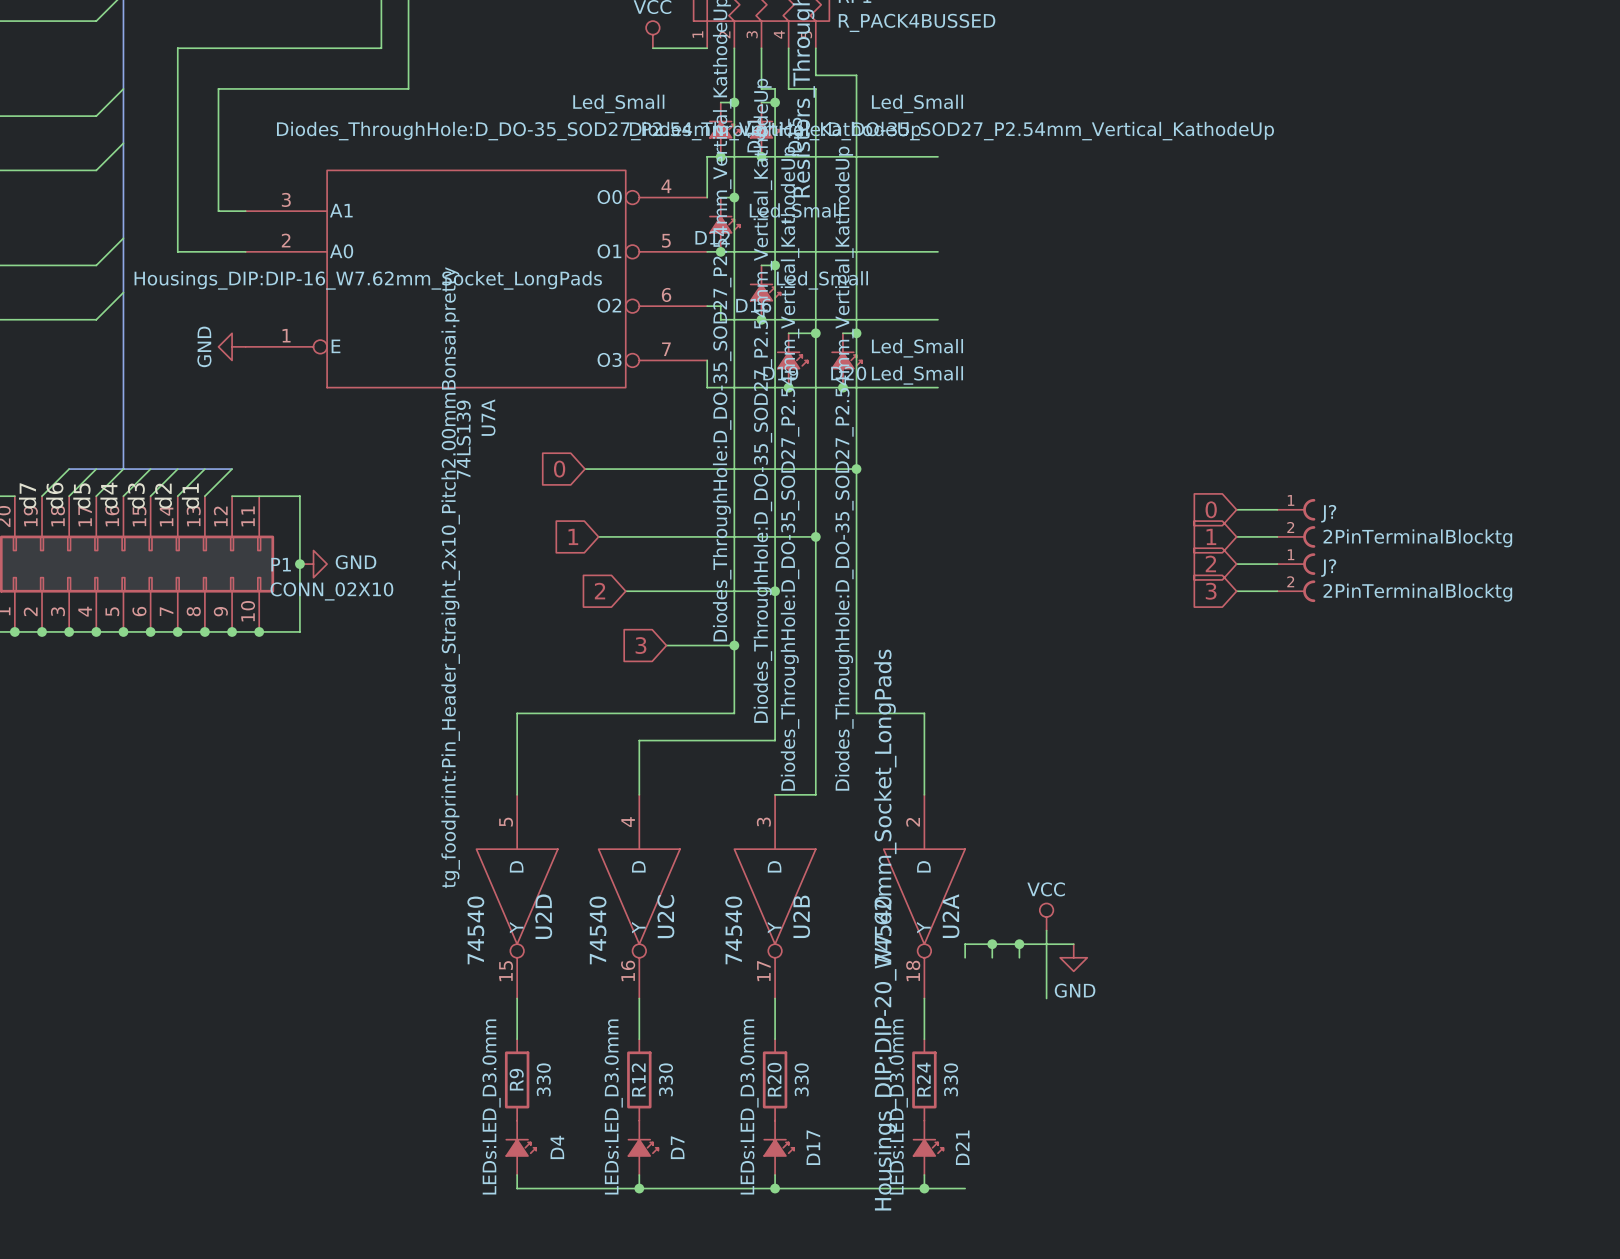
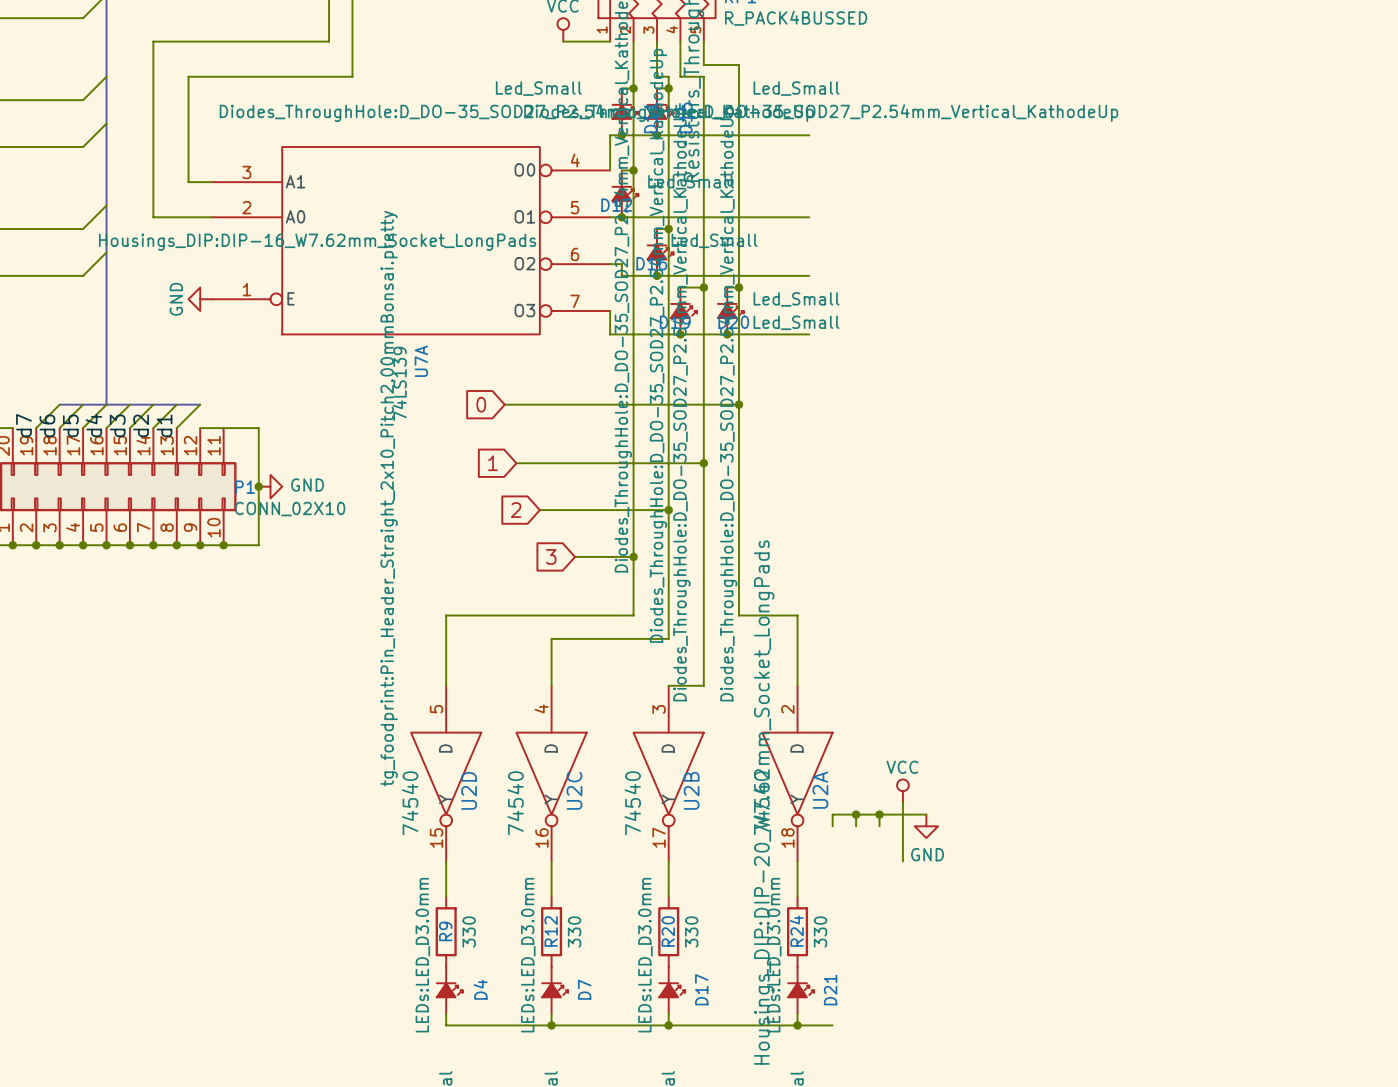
global label: 0 (1211, 509) -> none
wire: (1236, 509) (1277, 509) -> none
J?: 2PinTerminalBlocktg (1296, 523) -> none
global label: 1 (1211, 536) -> none
wire: (1236, 536) (1277, 536) -> none
global label: 2 (1210, 563) -> none
wire: (1236, 564) (1277, 564) -> none
J?: 2PinTerminalBlocktg (1296, 577) -> none
global label: 3 (1211, 591) -> none
wire: (1236, 591) (1277, 591) -> none

